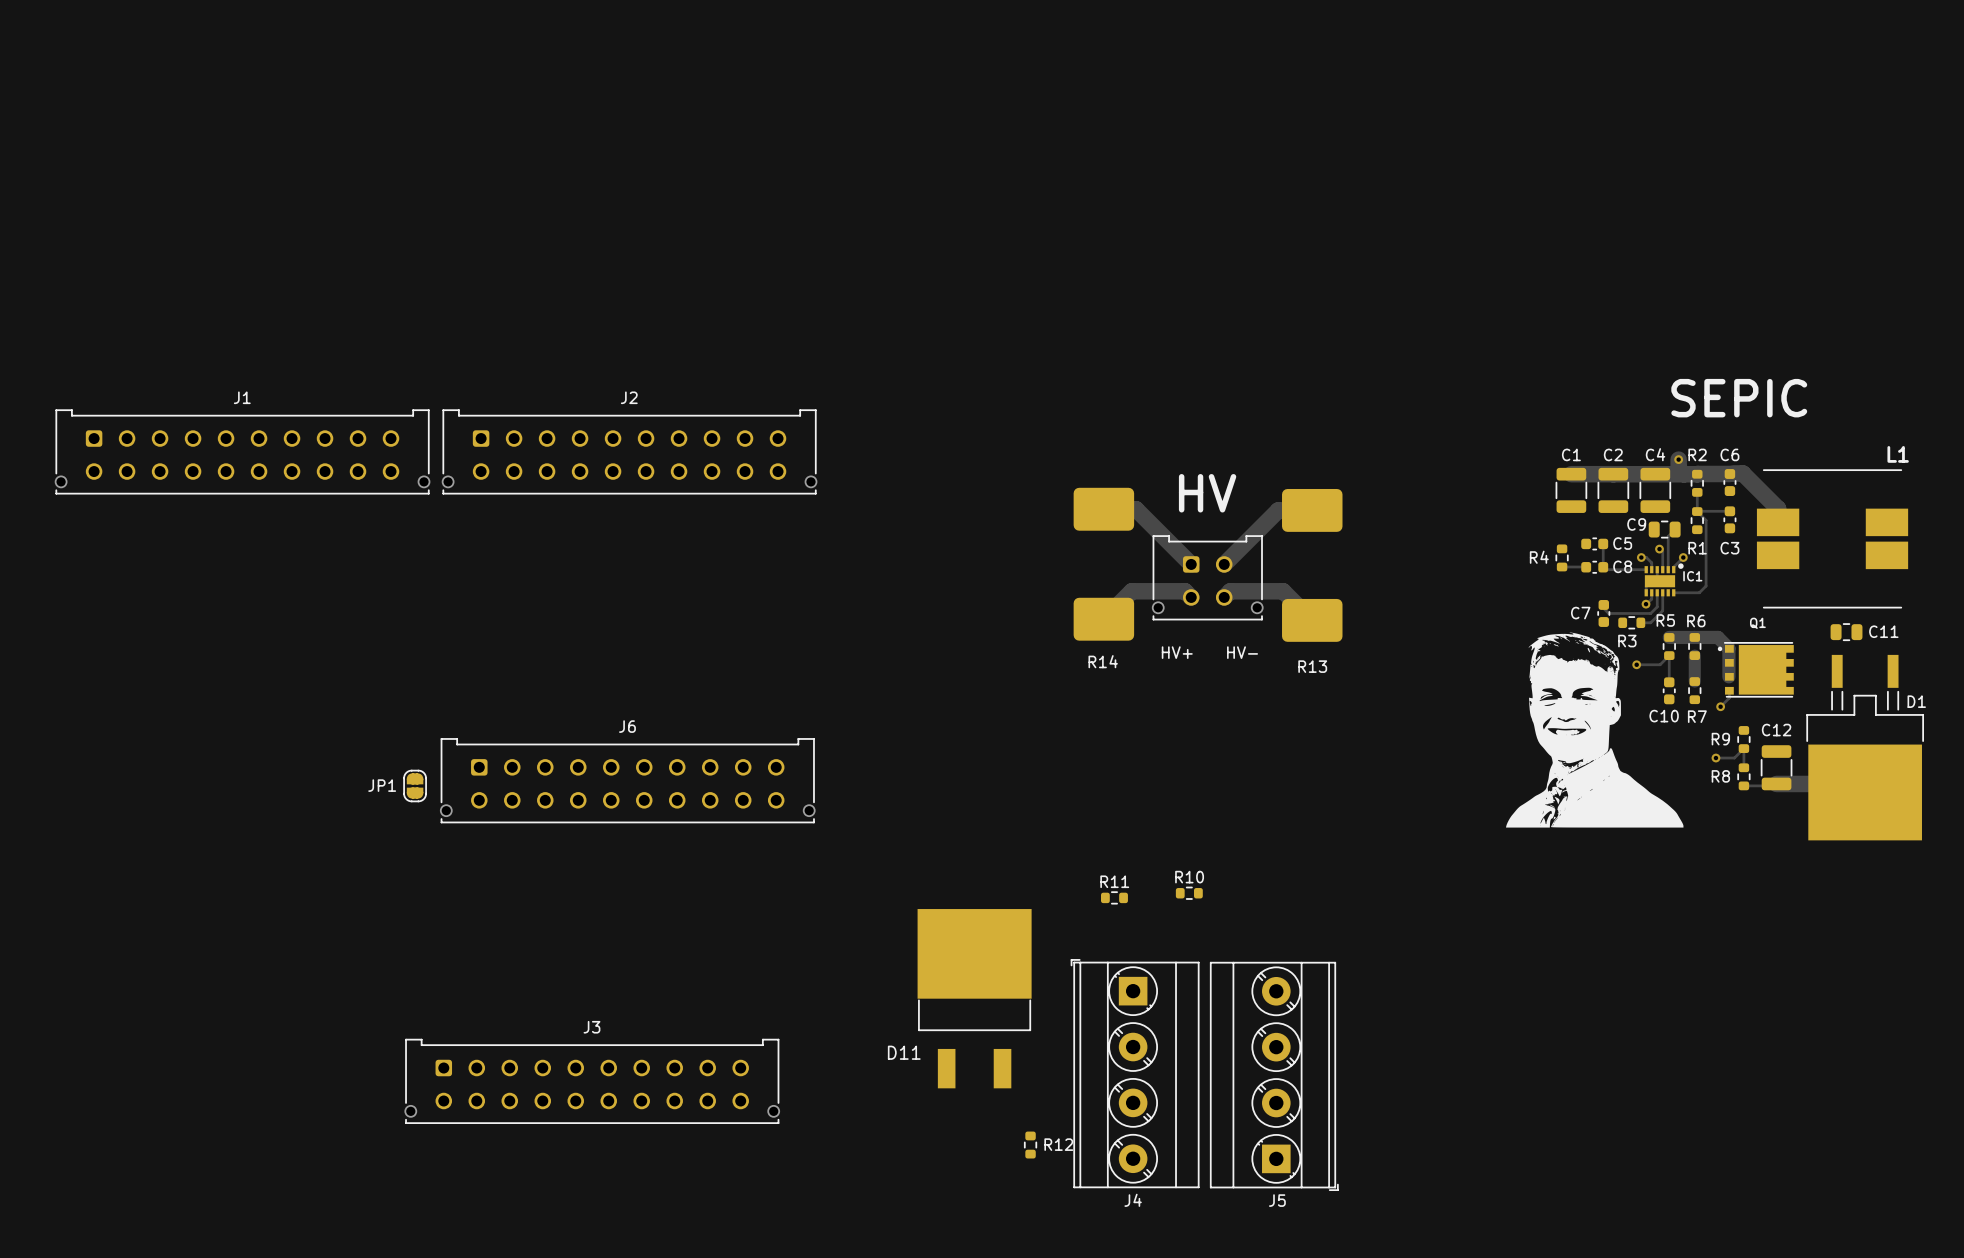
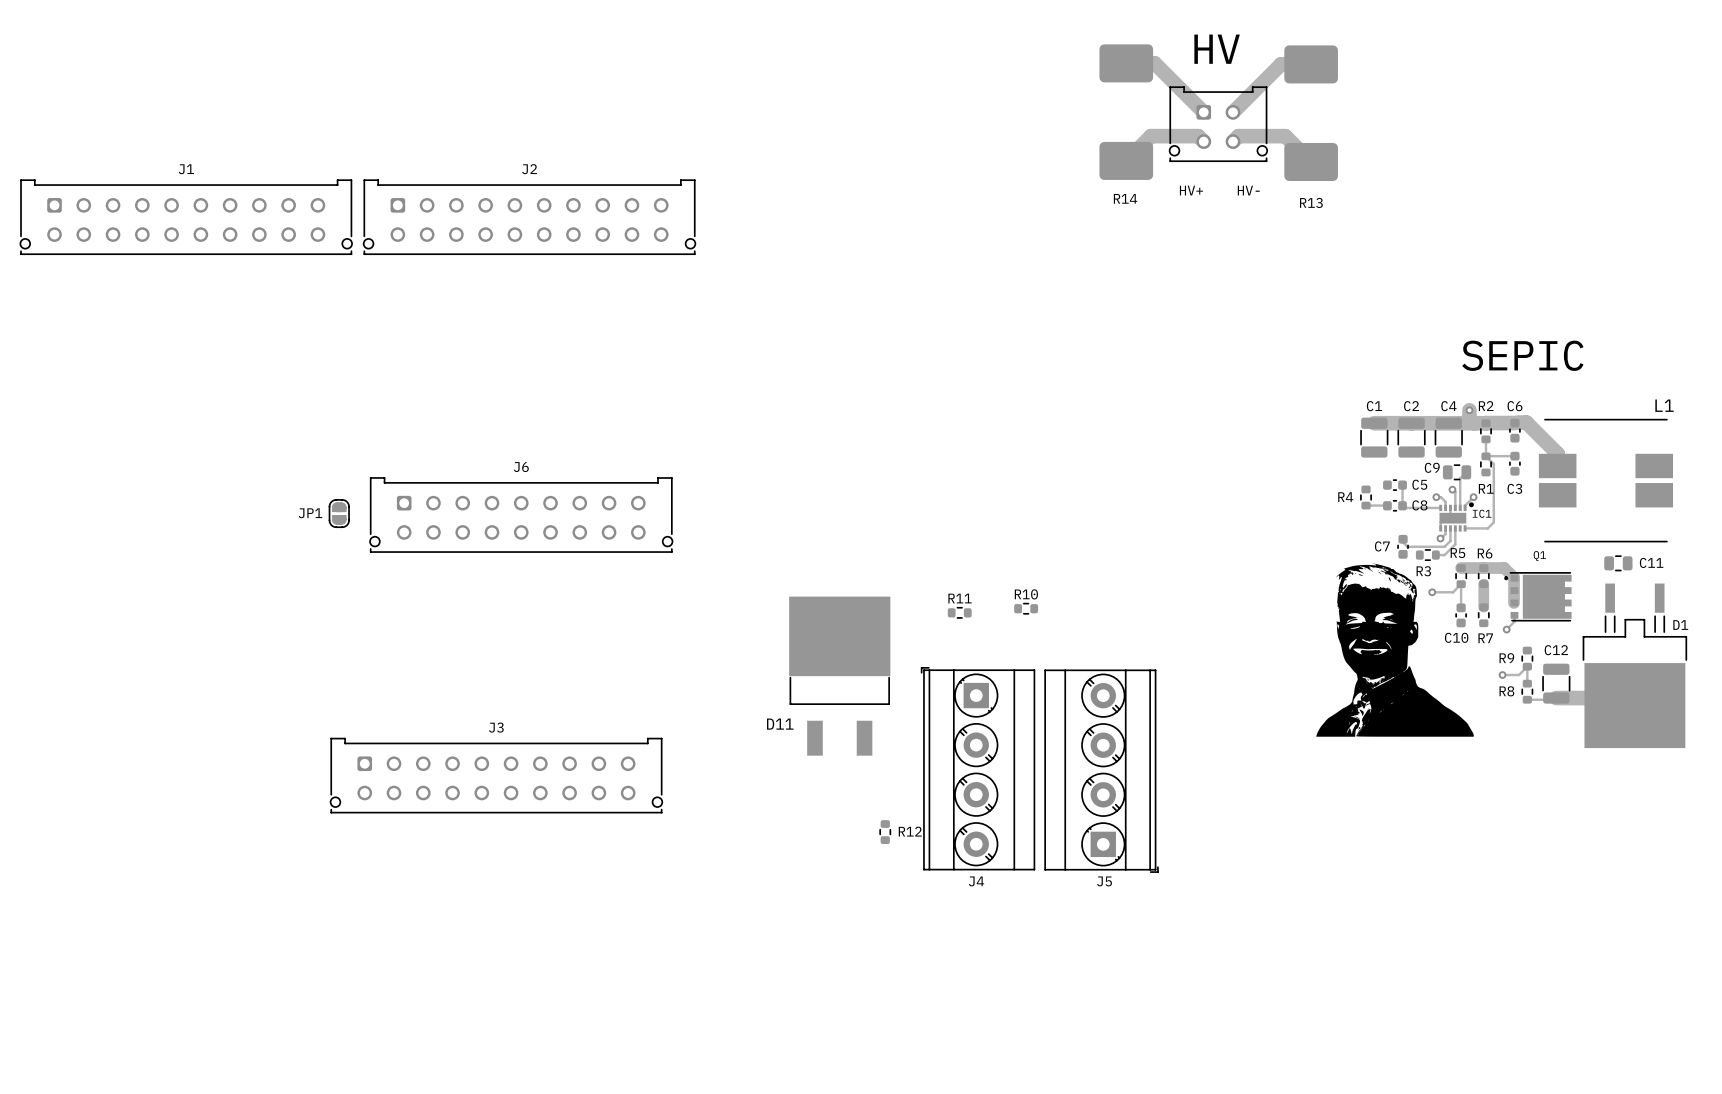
text: none -> HV (1217, 49)
track: none -> (1126, 63) (1154, 63) (1203, 112)
track: none -> (1311, 64) (1280, 64) (1233, 112)
part: none -> (1218, 124)
track: none -> (1203, 141) (1198, 136) (1151, 136) (1126, 160)
track: none -> (1233, 141) (1238, 136) (1285, 136) (1311, 161)
text: none -> HV+ (1191, 190)
text: none -> HV- (1248, 190)
J1 position: (242, 451) -> (186, 217)
J2 position: (629, 451) -> (529, 217)
text: HV (1207, 493) -> none
track: (1103, 509) (1136, 509) (1191, 564) -> none
track: (1312, 510) (1278, 510) (1224, 564) -> none
R14 position: (1103, 564) -> (1126, 112)
R13 position: (1312, 565) -> (1311, 113)
part: (1207, 577) -> none
track: (1191, 597) (1185, 591) (1131, 591) (1103, 619) -> none
track: (1224, 597) (1230, 591) (1283, 591) (1312, 620) -> none
text: HV+ (1177, 652) -> none
text: HV- (1242, 652) -> none
J6 footprint: [440, 738, 815, 824] -> [370, 477, 673, 553]
JP1 position: (415, 786) -> (339, 513)
R10 position: (1189, 893) -> (1026, 608)
R11 position: (1114, 897) -> (959, 612)
D11 position: (974, 998) -> (839, 676)
J4 position: (1135, 1073) -> (978, 768)
J5 position: (1274, 1076) -> (1101, 771)
J3 position: (592, 1081) -> (496, 775)
R12 position: (1030, 1145) -> (885, 832)

